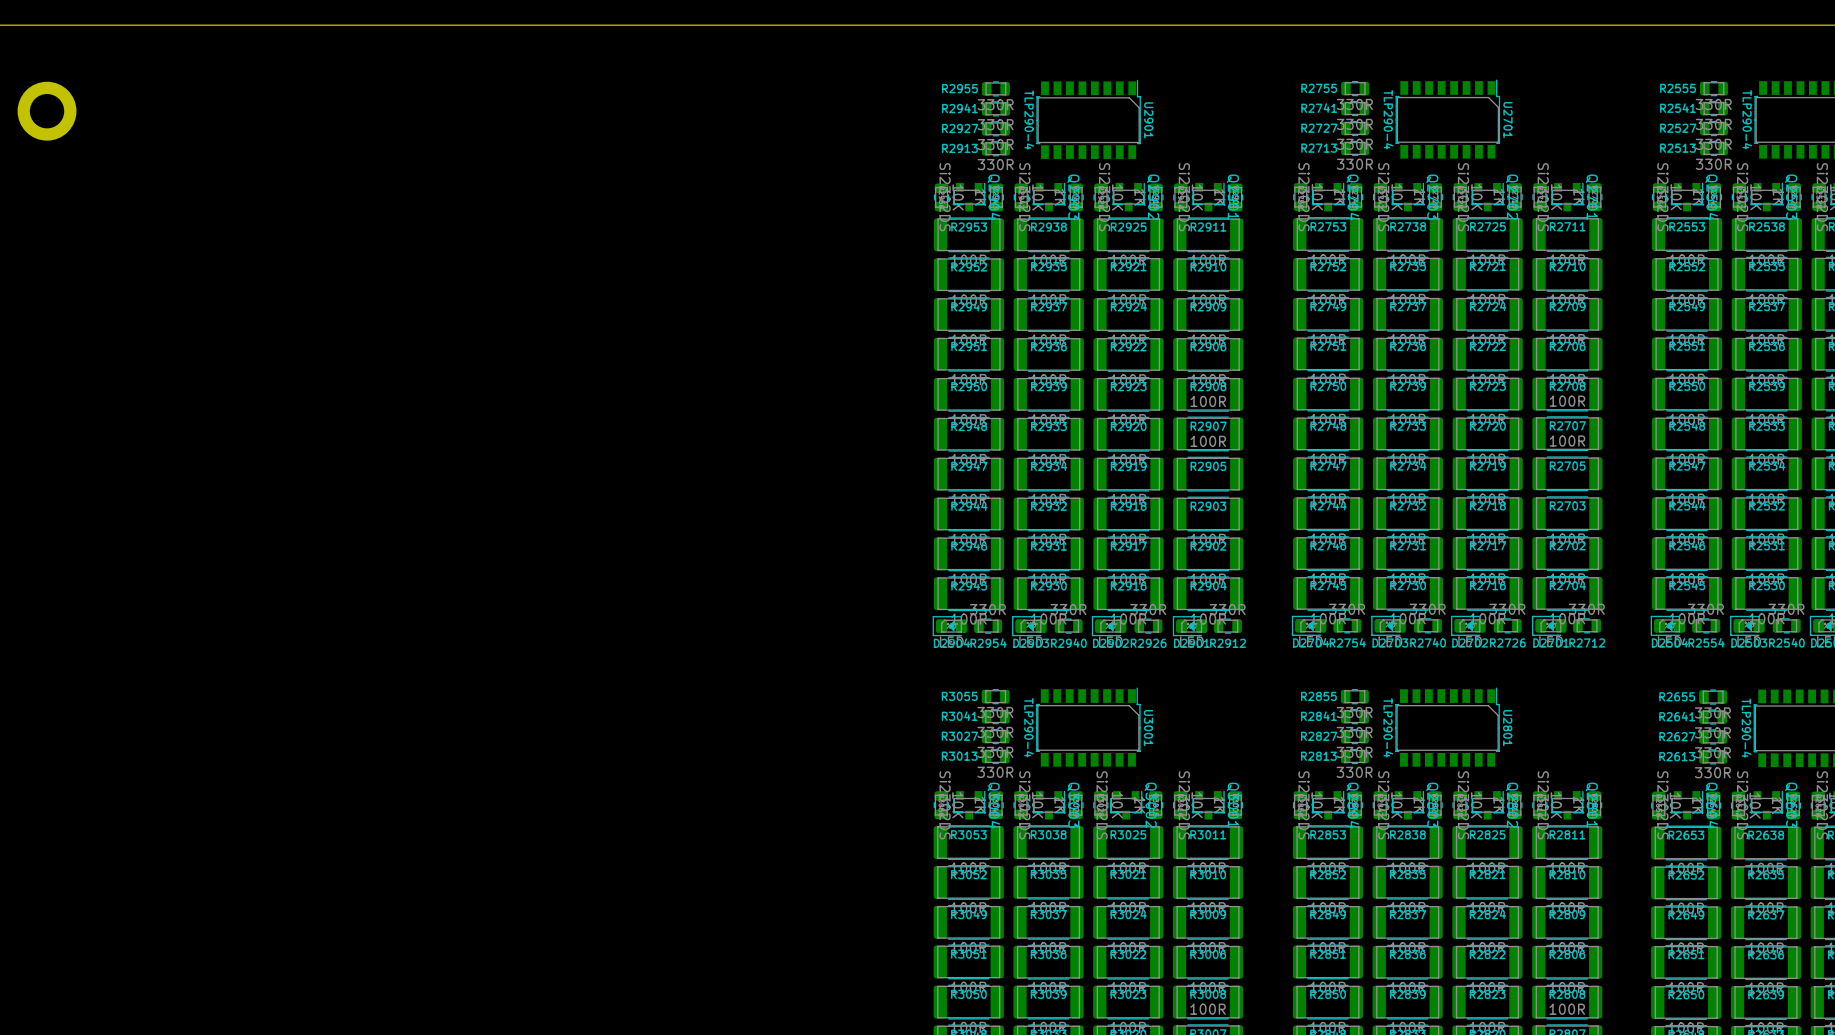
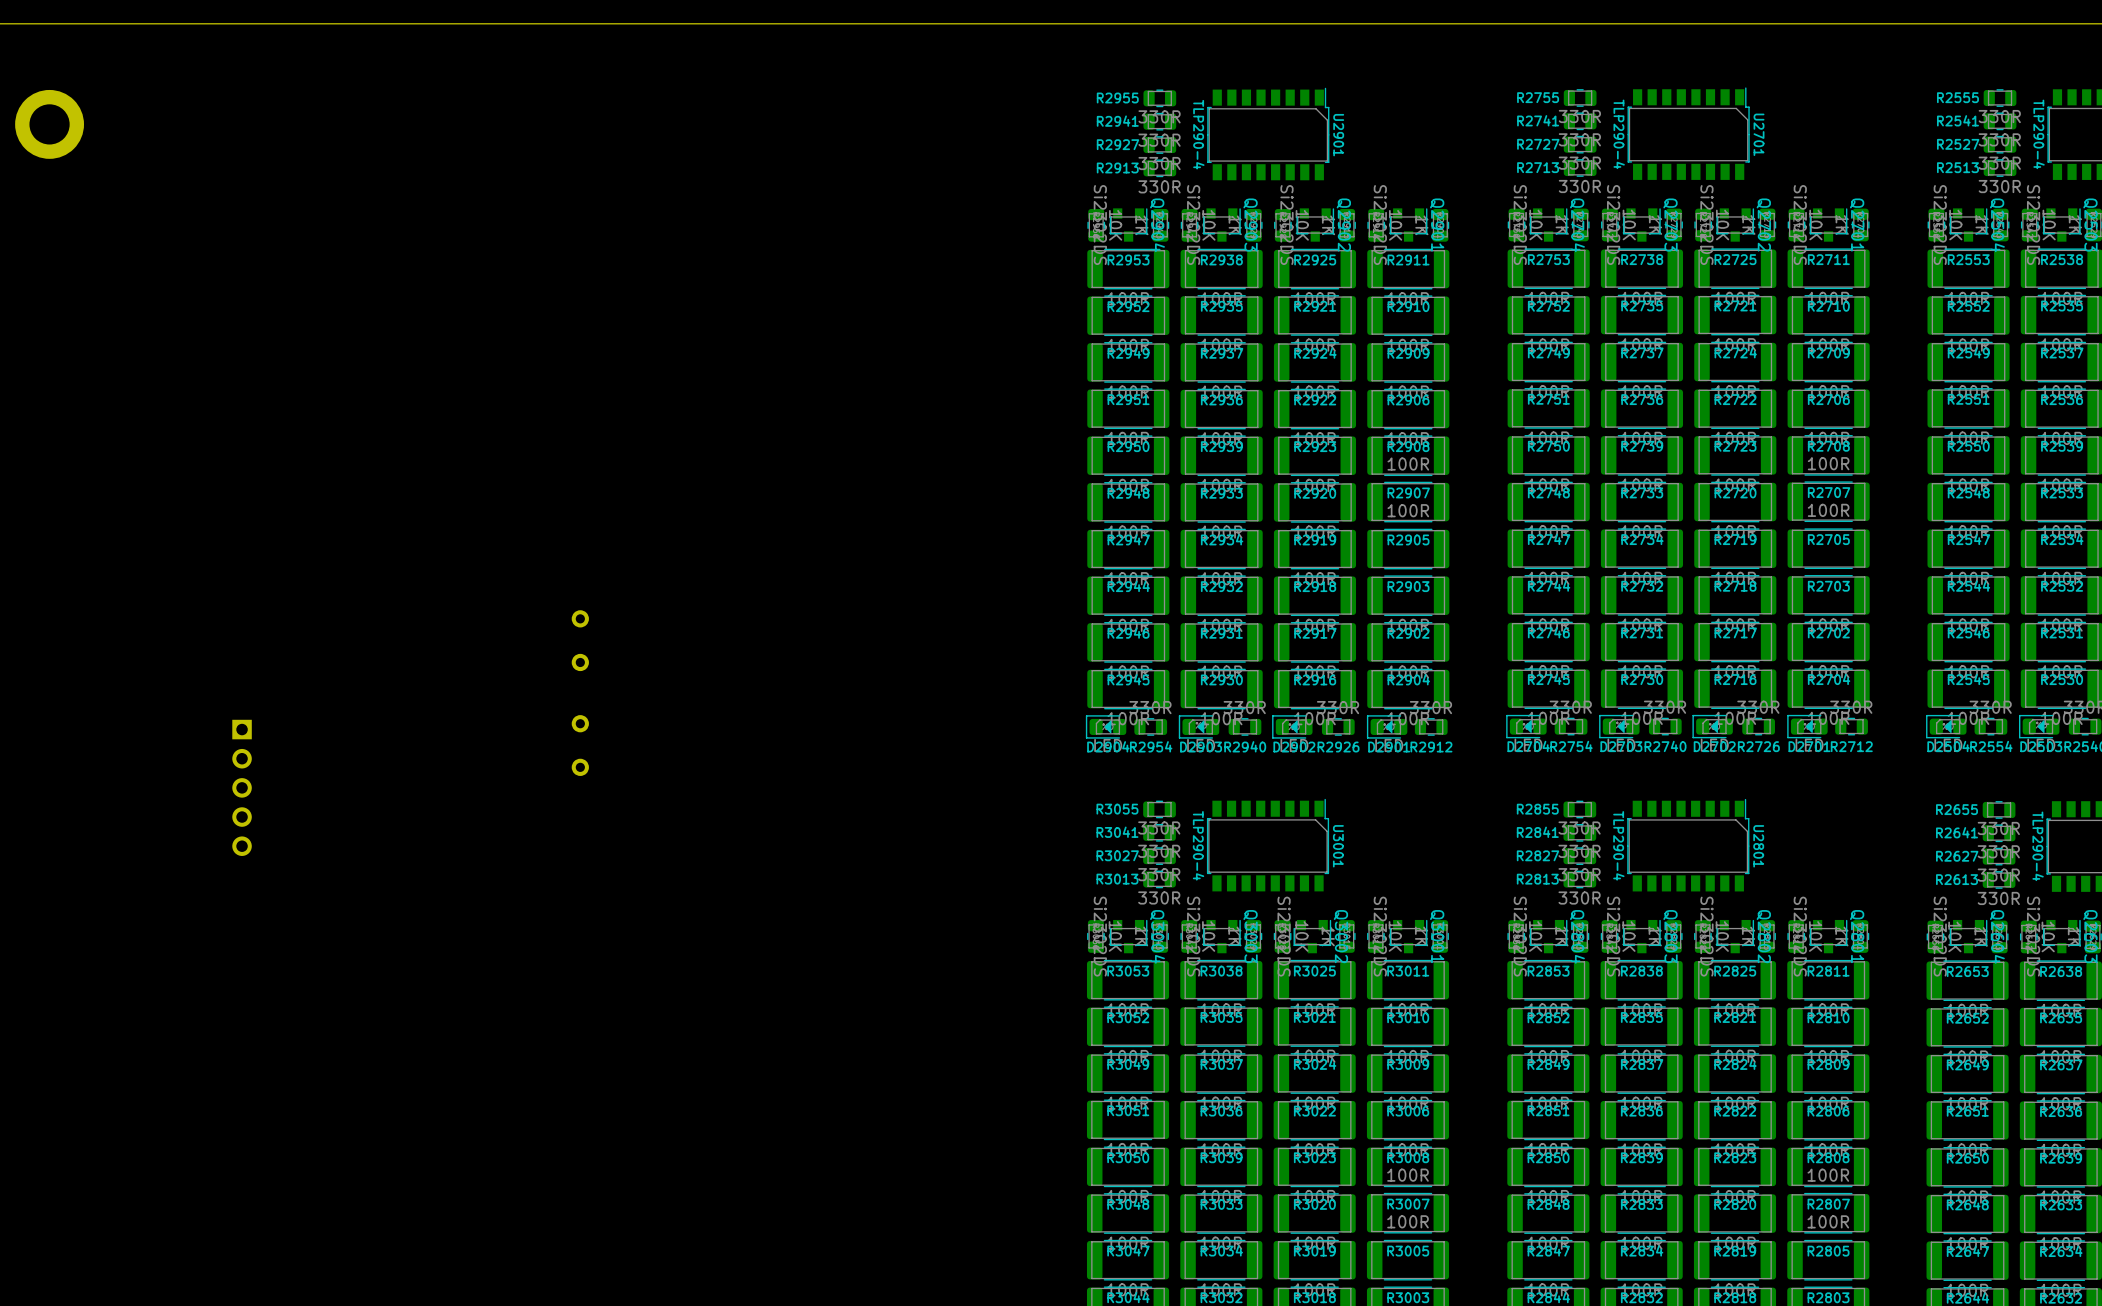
part: none -> (580, 640)
part: none -> (580, 745)
part: none -> (242, 787)

